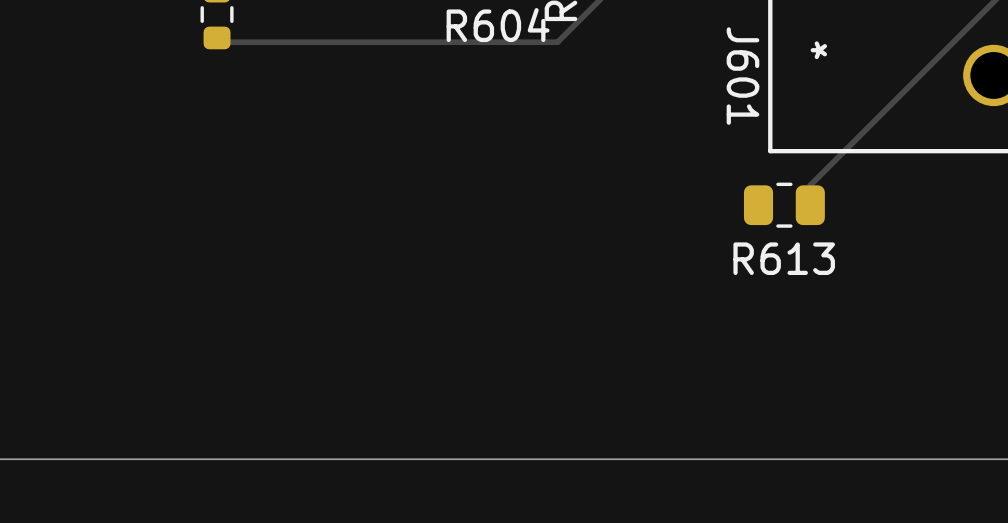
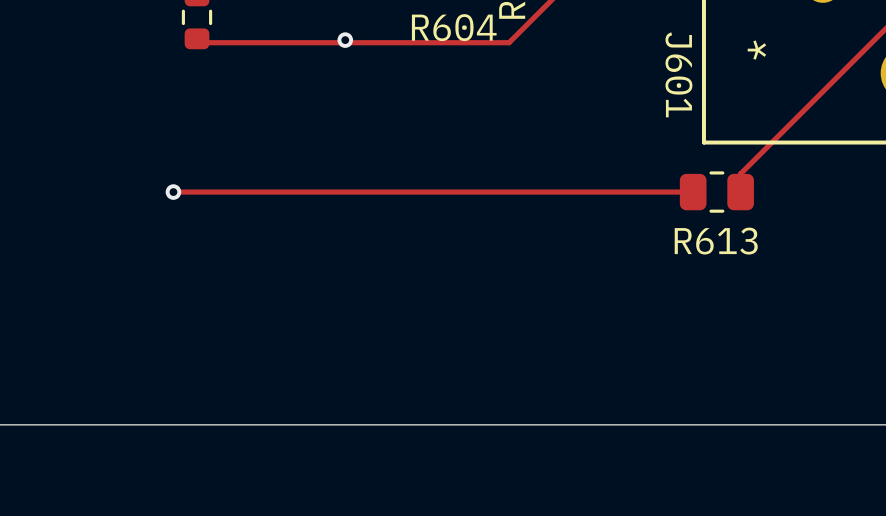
via: none -> (345, 40)
track: none -> (173, 192) (693, 192)
via: none -> (173, 192)

